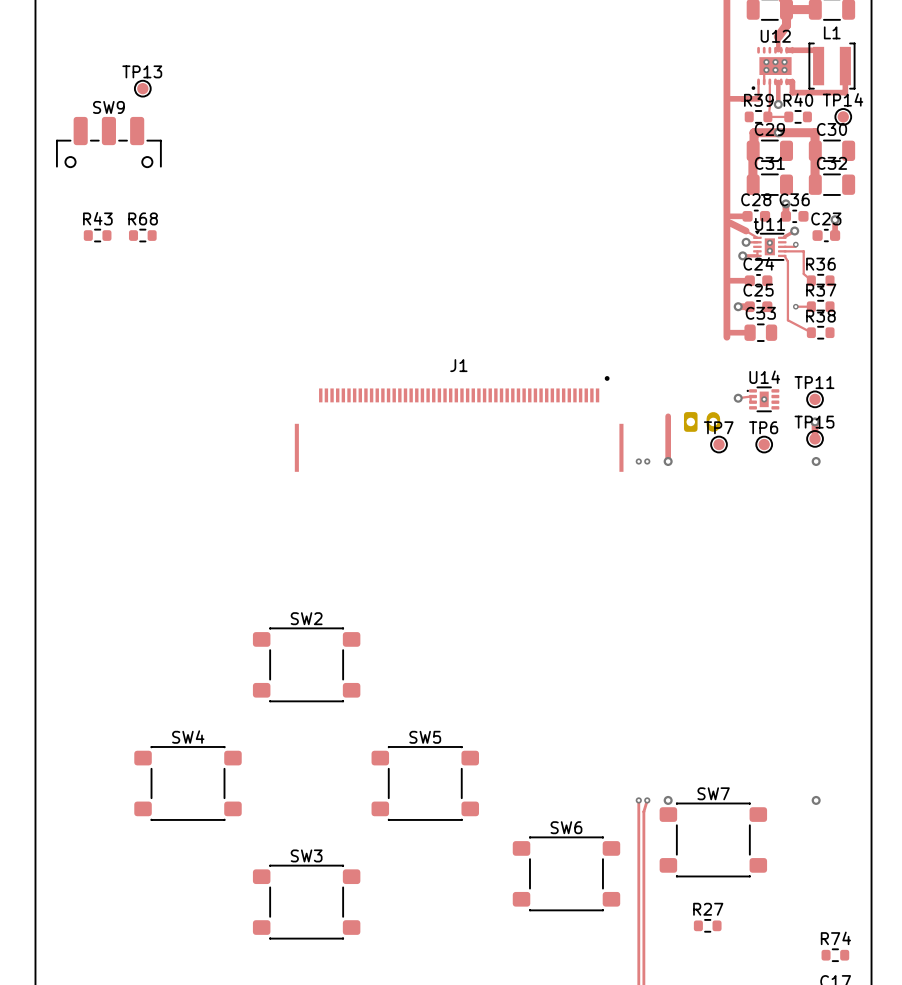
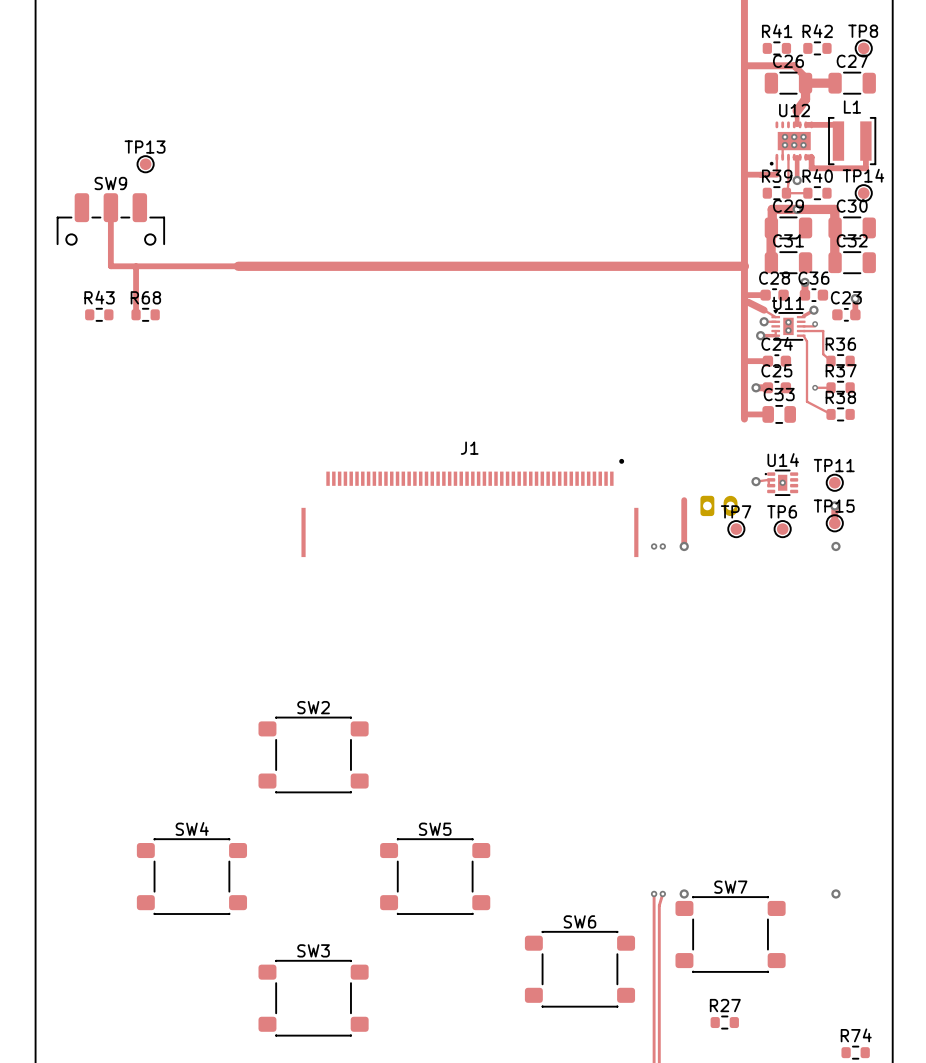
track: none -> (110, 216) (110, 266) (744, 266)
track: none -> (136, 266) (136, 314)

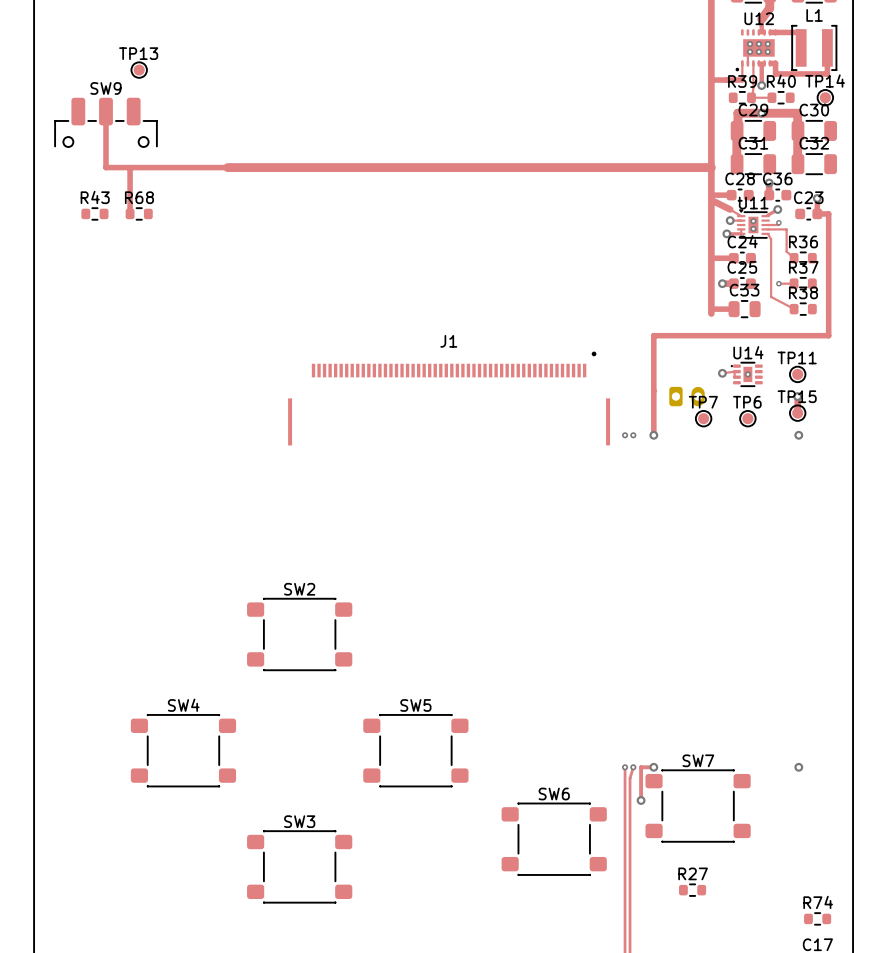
track: none -> (817, 213) (828, 213) (828, 335) (653, 335) (653, 391)
track: none -> (653, 767) (641, 767) (641, 800)
via: none -> (641, 800)

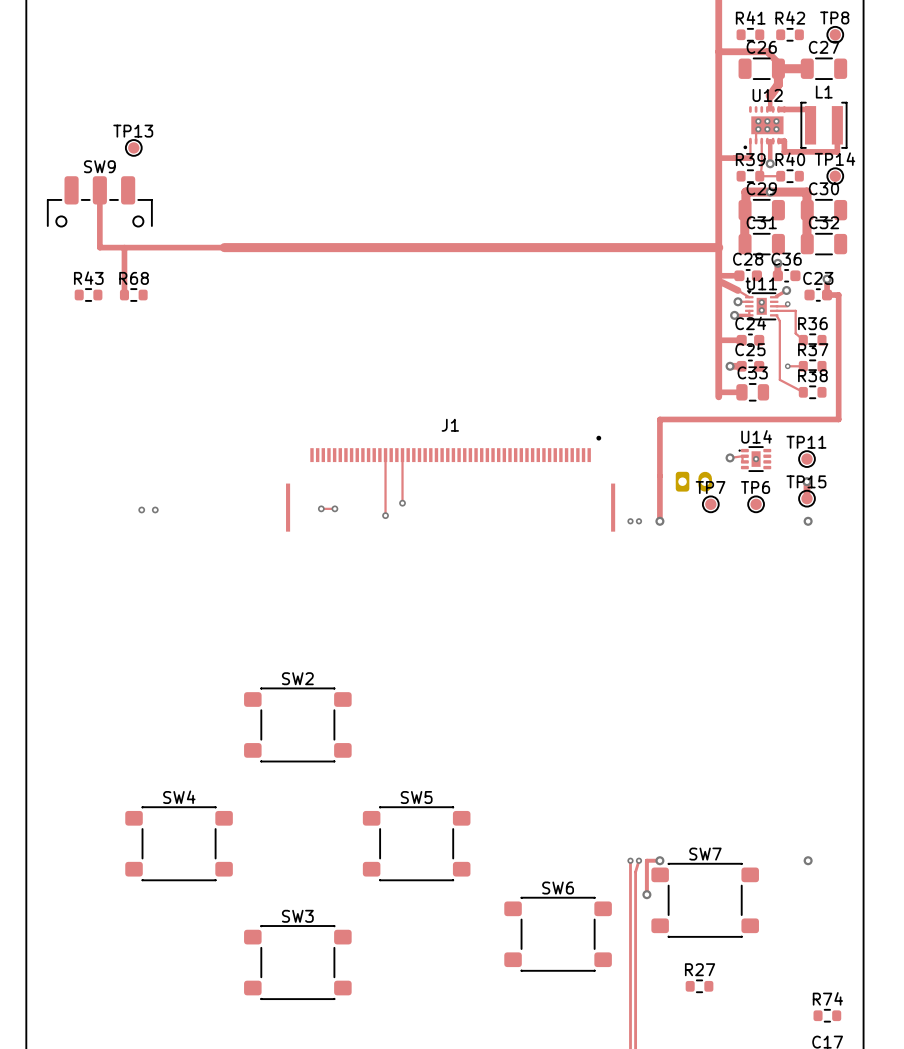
track: none -> (385, 457) (385, 515)
track: none -> (402, 457) (402, 503)
via: none -> (402, 503)
track: none -> (321, 508) (334, 508)
via: none -> (321, 508)
via: none -> (334, 508)
via: none -> (141, 509)
via: none -> (155, 509)
via: none -> (385, 515)

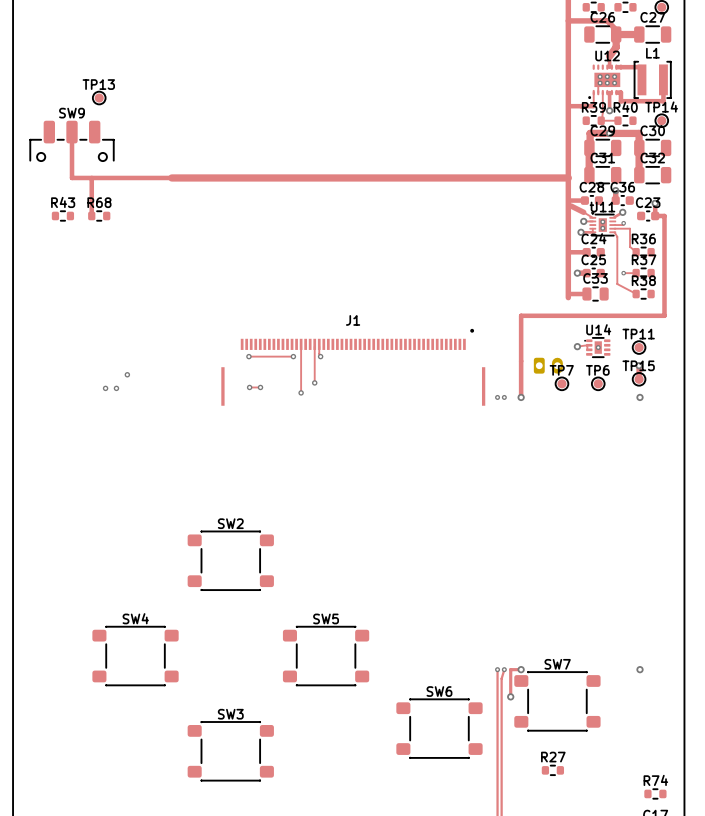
track: none -> (319, 346) (320, 356)
track: none -> (248, 356) (293, 356)
via: none -> (248, 356)
via: none -> (293, 356)
via: none -> (320, 356)
via: none -> (127, 374)

